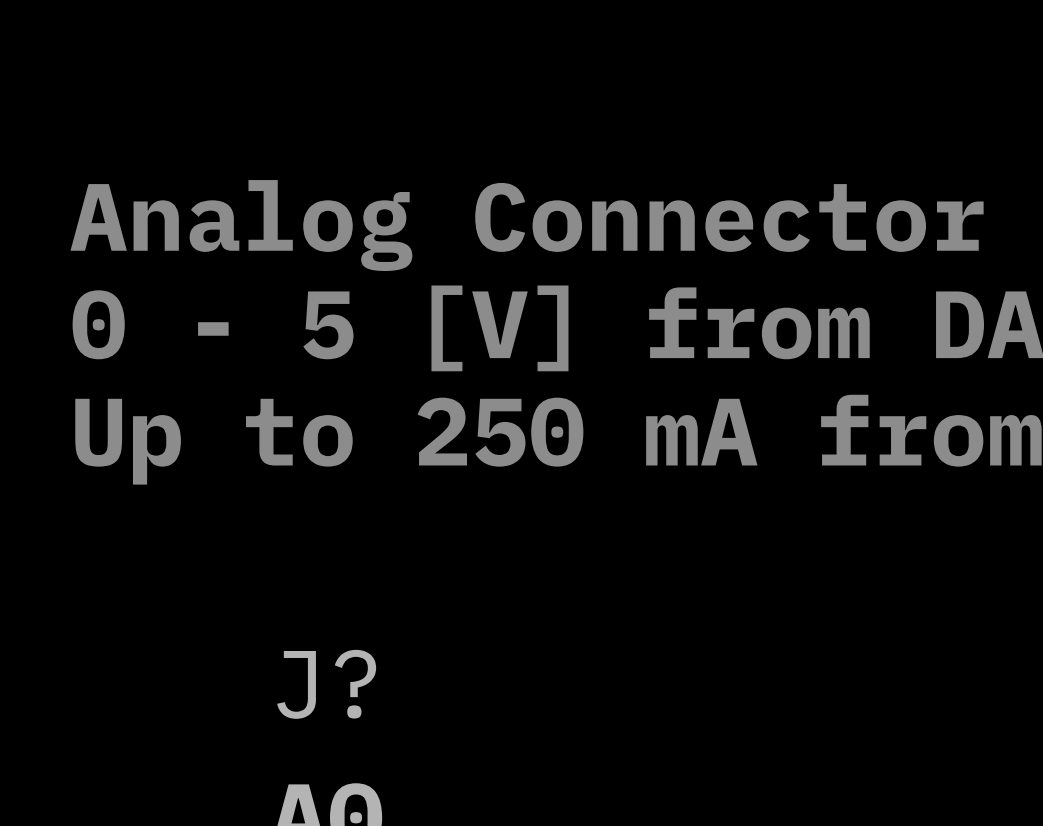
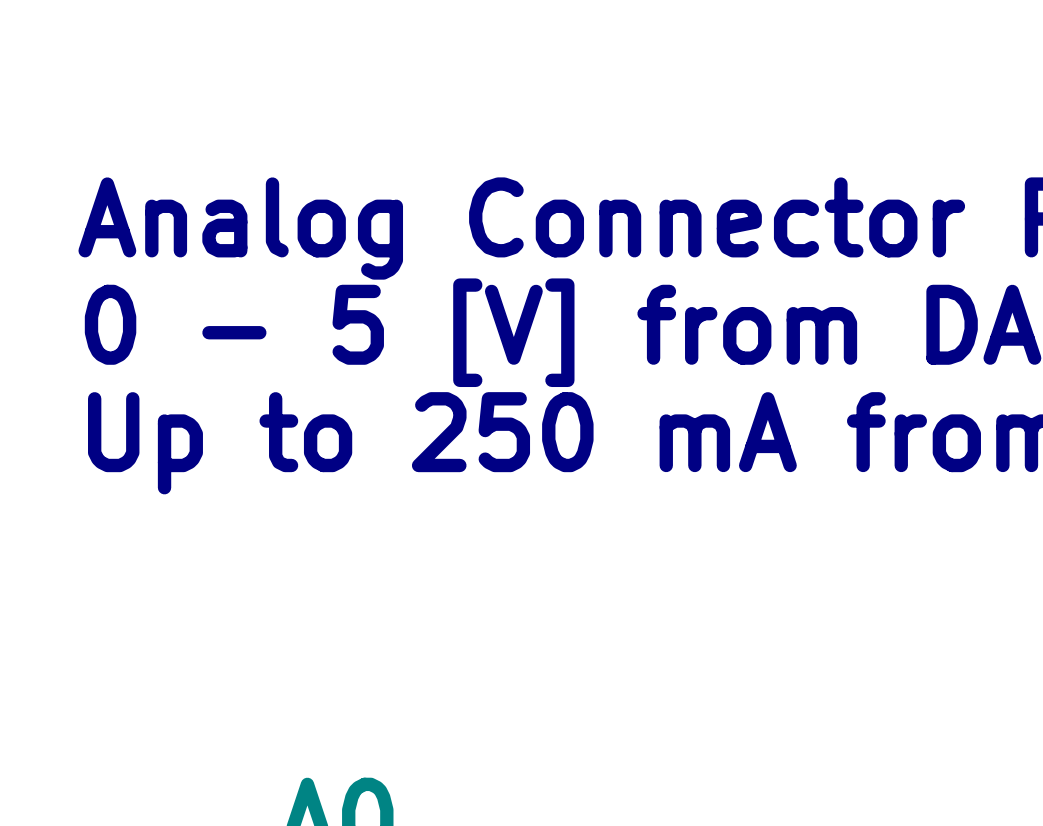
J? name: J? (326, 684) -> none

